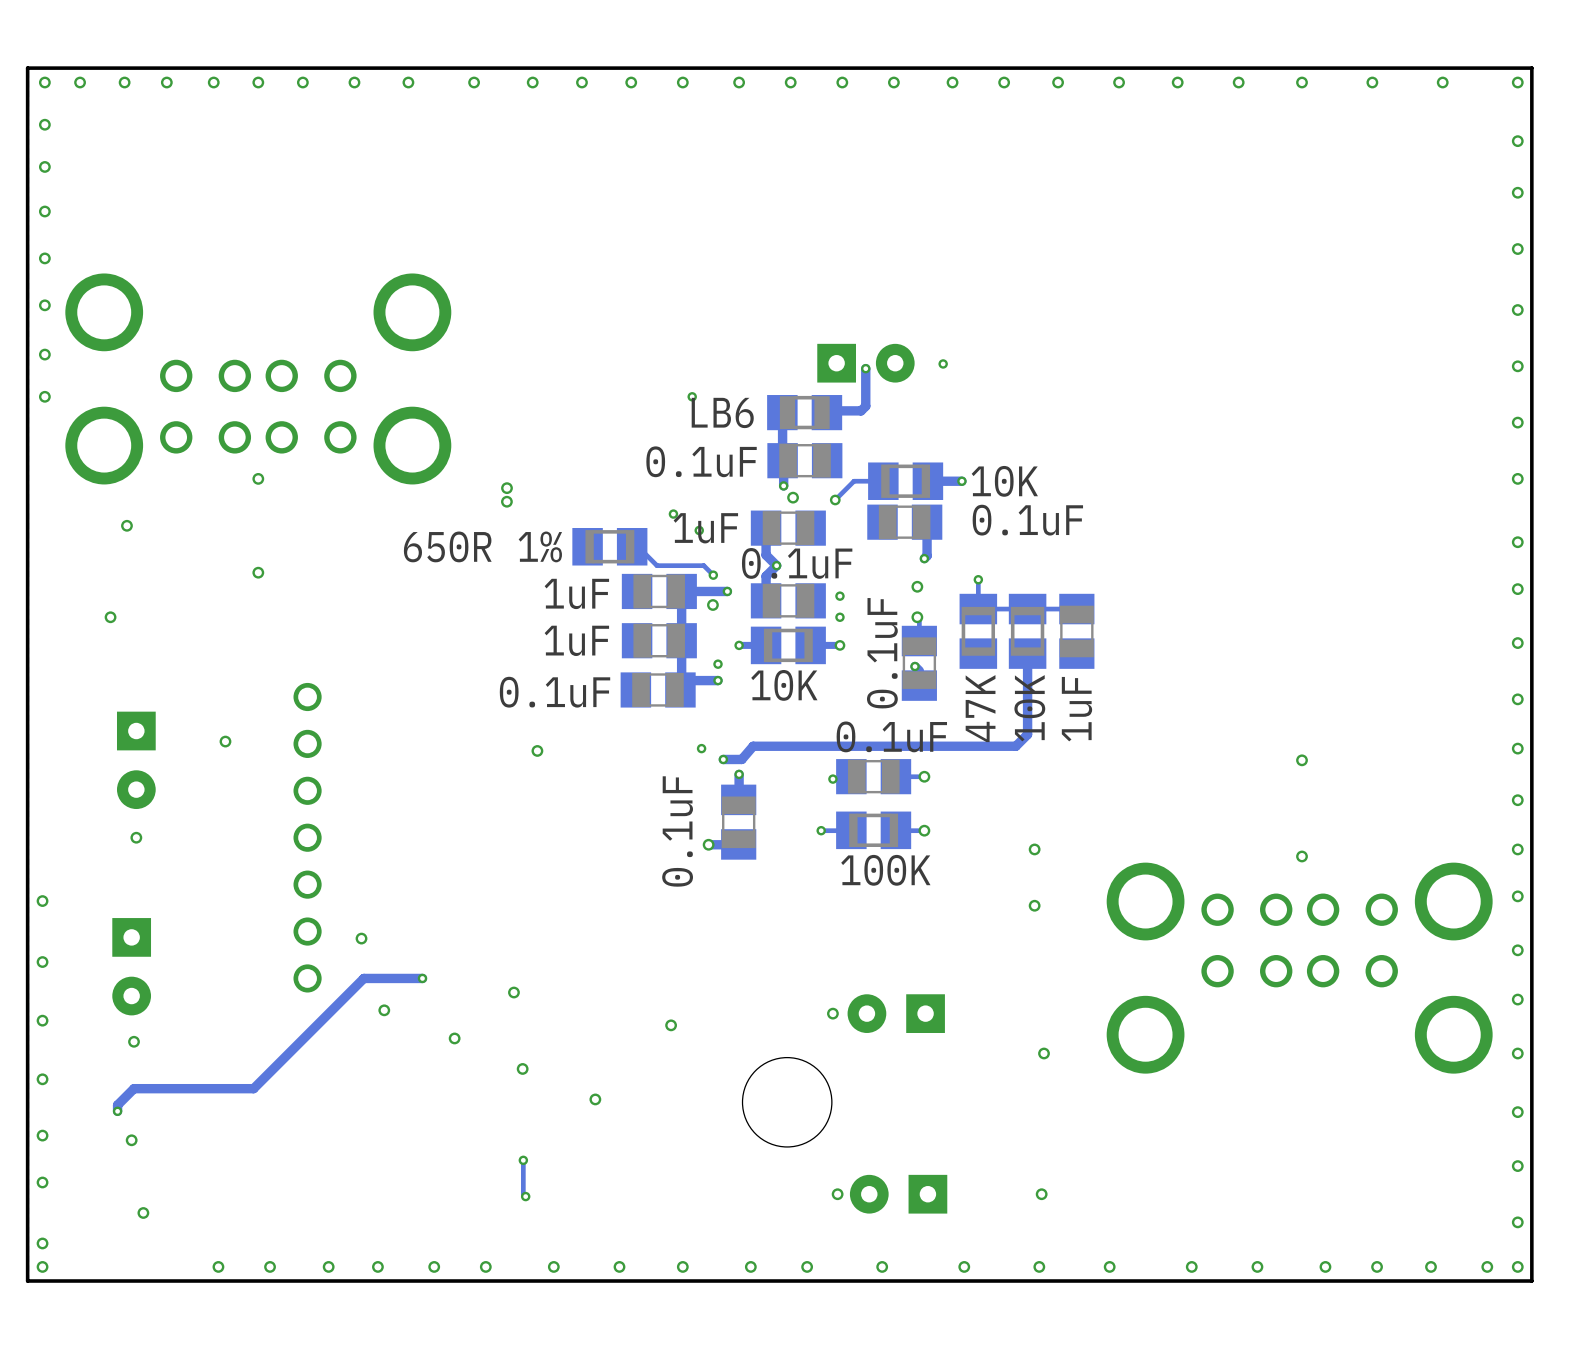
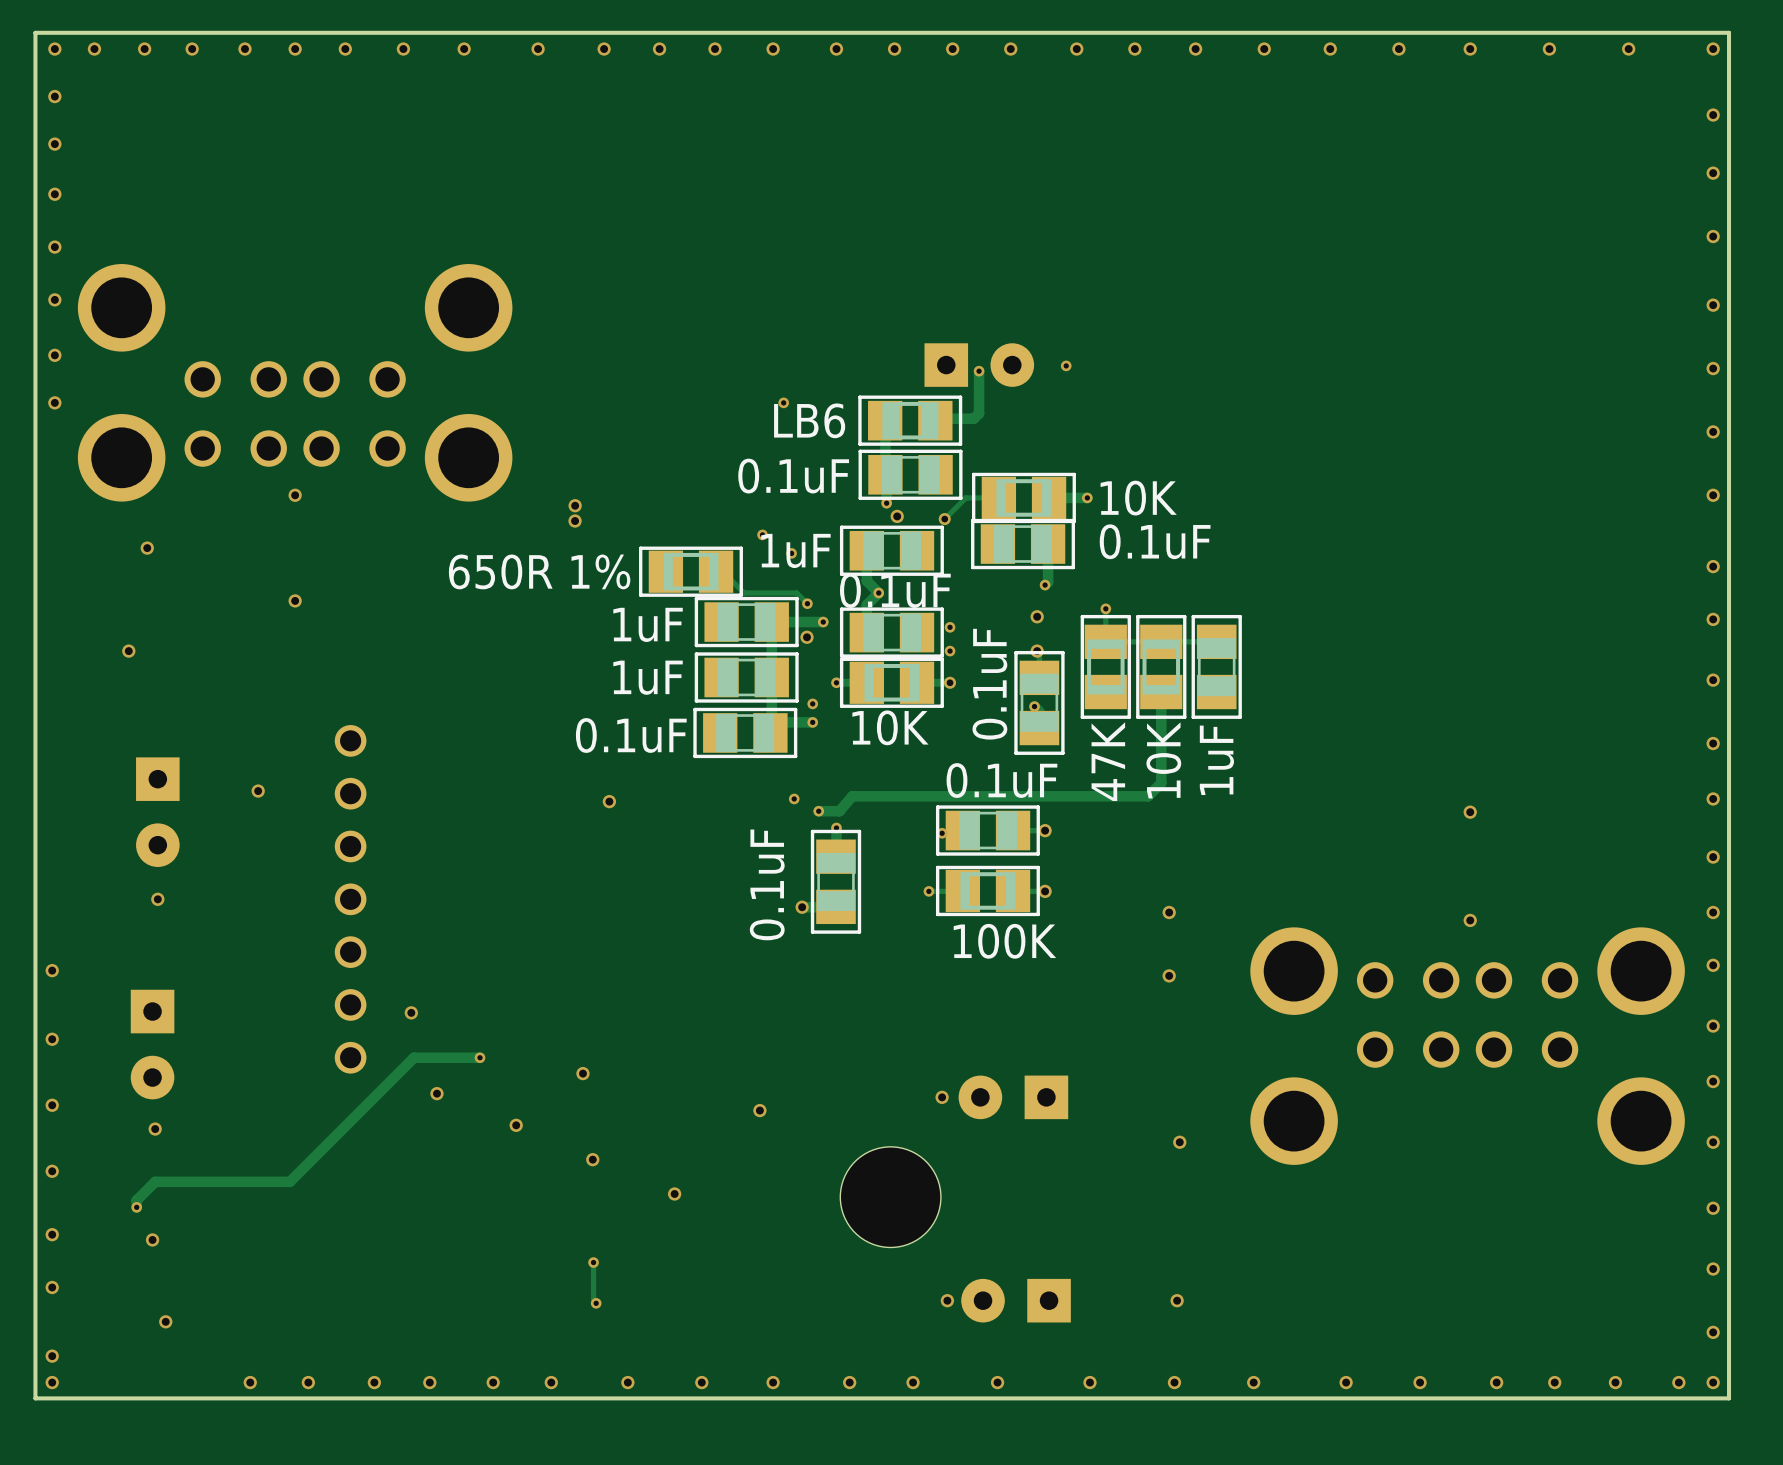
LB6 footprint: [767, 395, 843, 431] -> [858, 395, 963, 446]
part footprint: [767, 443, 843, 479] -> [858, 449, 963, 500]
part footprint: [868, 462, 944, 500] -> [971, 472, 1076, 524]
part footprint: [867, 504, 943, 540] -> [971, 518, 1075, 570]
part footprint: [750, 510, 826, 546] -> [839, 525, 944, 576]
part footprint: [572, 527, 648, 566] -> [639, 546, 743, 597]
part footprint: [621, 573, 697, 610] -> [694, 596, 799, 648]
part footprint: [750, 583, 826, 619] -> [839, 607, 944, 658]
part footprint: [959, 593, 998, 669] -> [1080, 614, 1131, 719]
part footprint: [1008, 593, 1047, 669] -> [1136, 614, 1187, 719]
part footprint: [1059, 593, 1095, 669] -> [1191, 614, 1242, 719]
part footprint: [621, 623, 697, 659] -> [694, 652, 799, 703]
part footprint: [901, 625, 937, 701] -> [1014, 650, 1065, 755]
part footprint: [750, 626, 826, 665] -> [839, 657, 944, 708]
part footprint: [620, 672, 696, 708] -> [693, 707, 798, 759]
part footprint: [836, 759, 912, 795] -> [935, 805, 1040, 856]
part footprint: [721, 784, 757, 860] -> [810, 829, 862, 934]
part footprint: [836, 811, 912, 850] -> [935, 865, 1040, 917]

